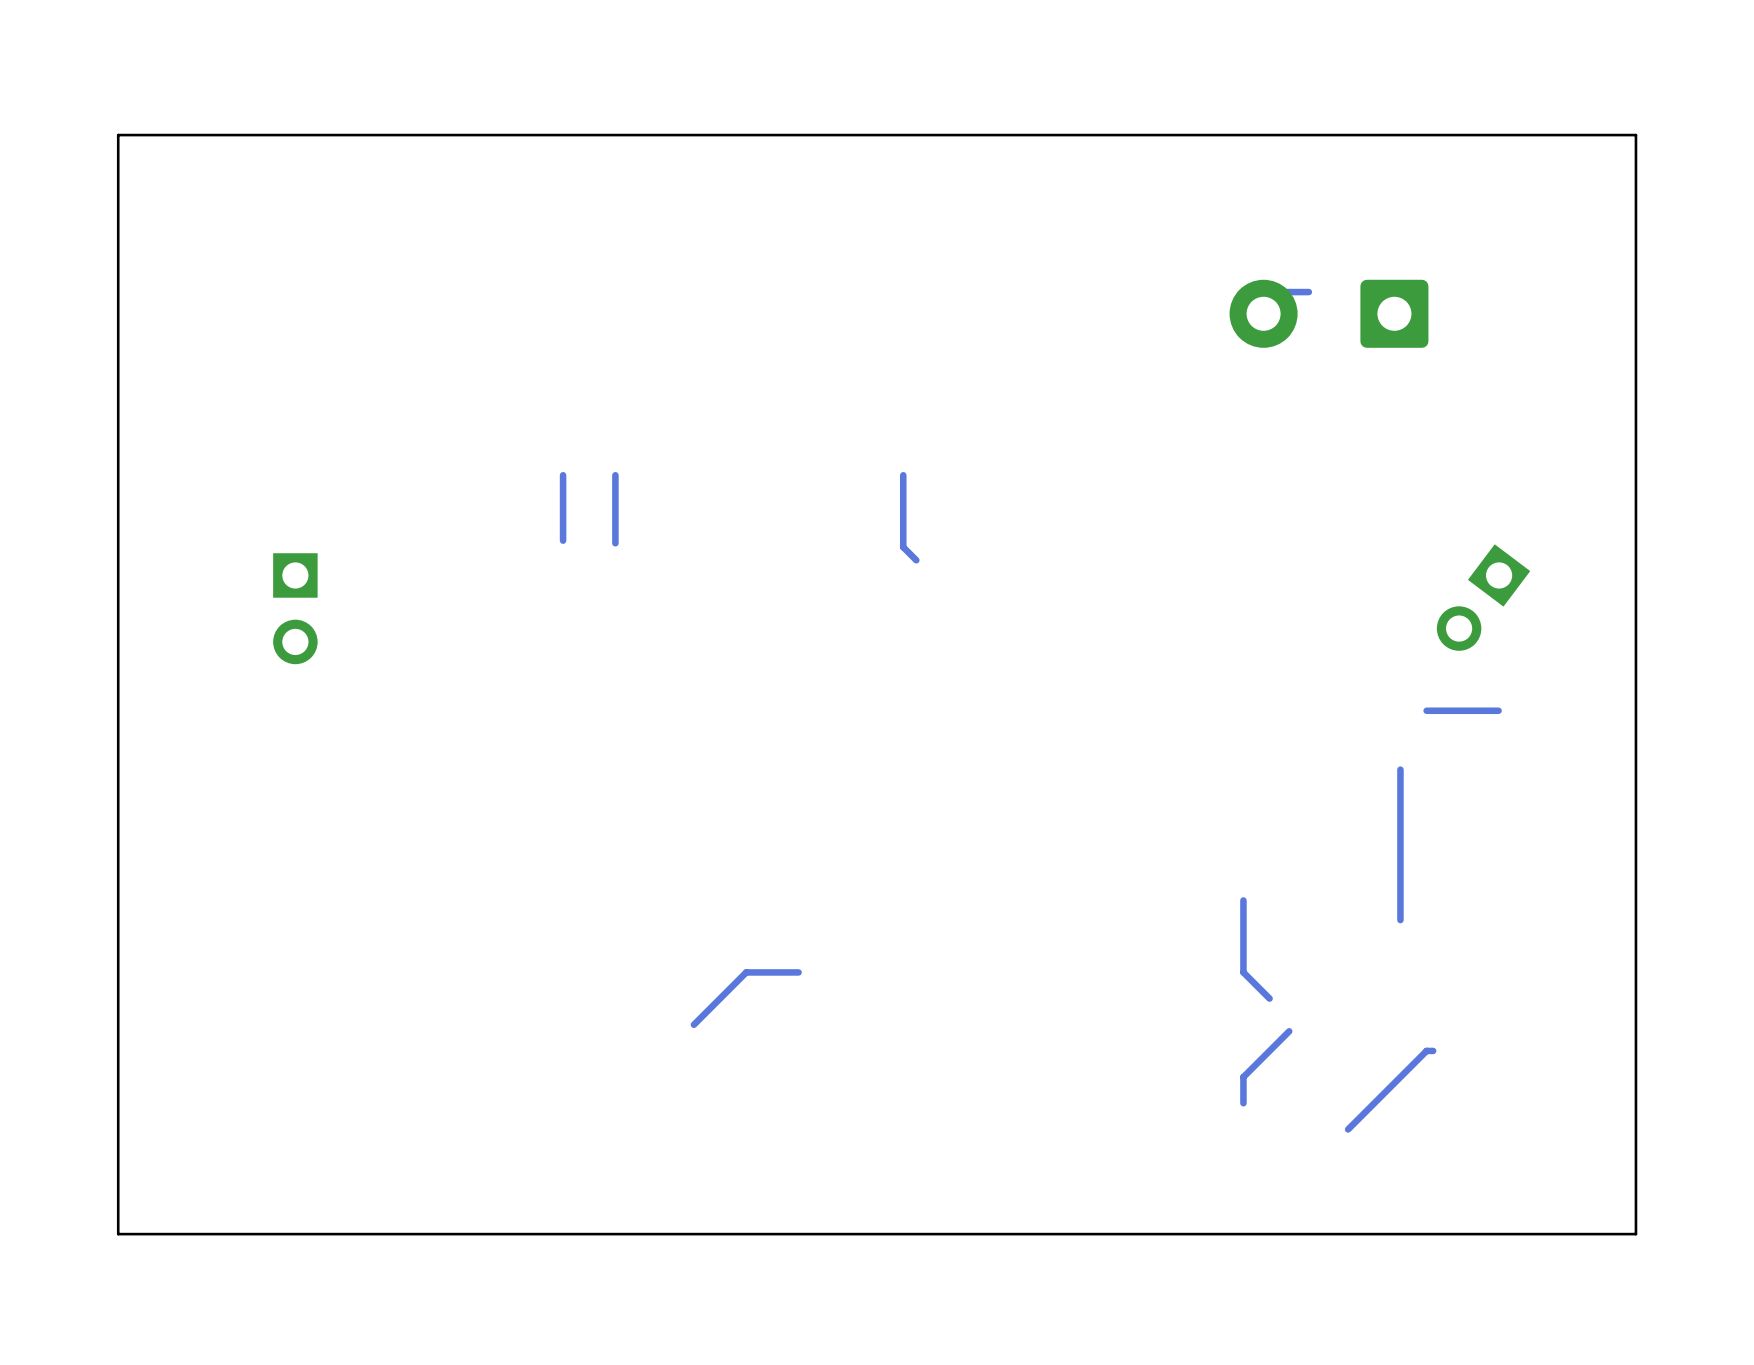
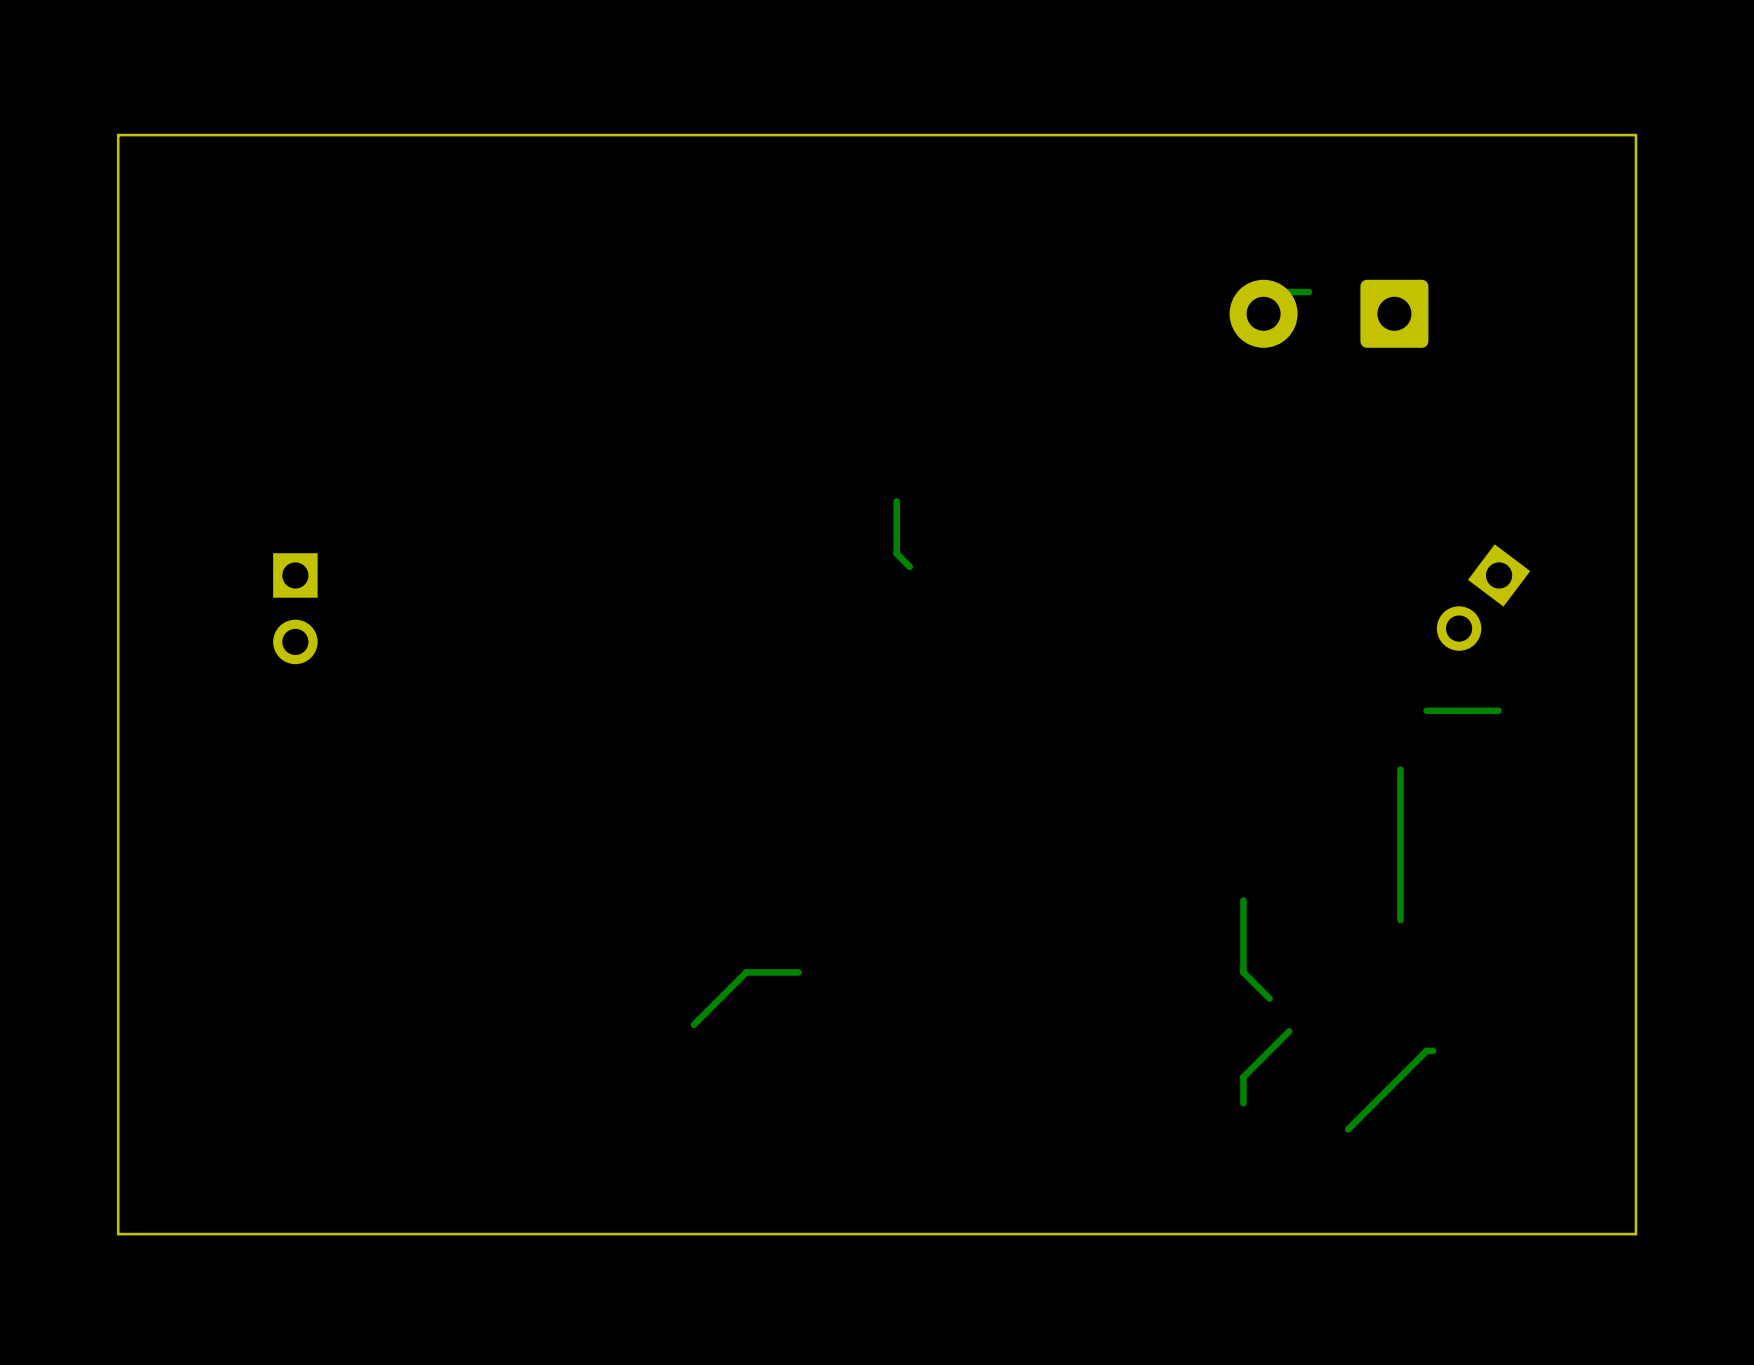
track: (563, 475) (563, 540) -> none
track: (615, 475) (615, 543) -> none
track: (903, 475) (903, 547) (916, 560) -> none
track: none -> (896, 501) (896, 553) (909, 566)

